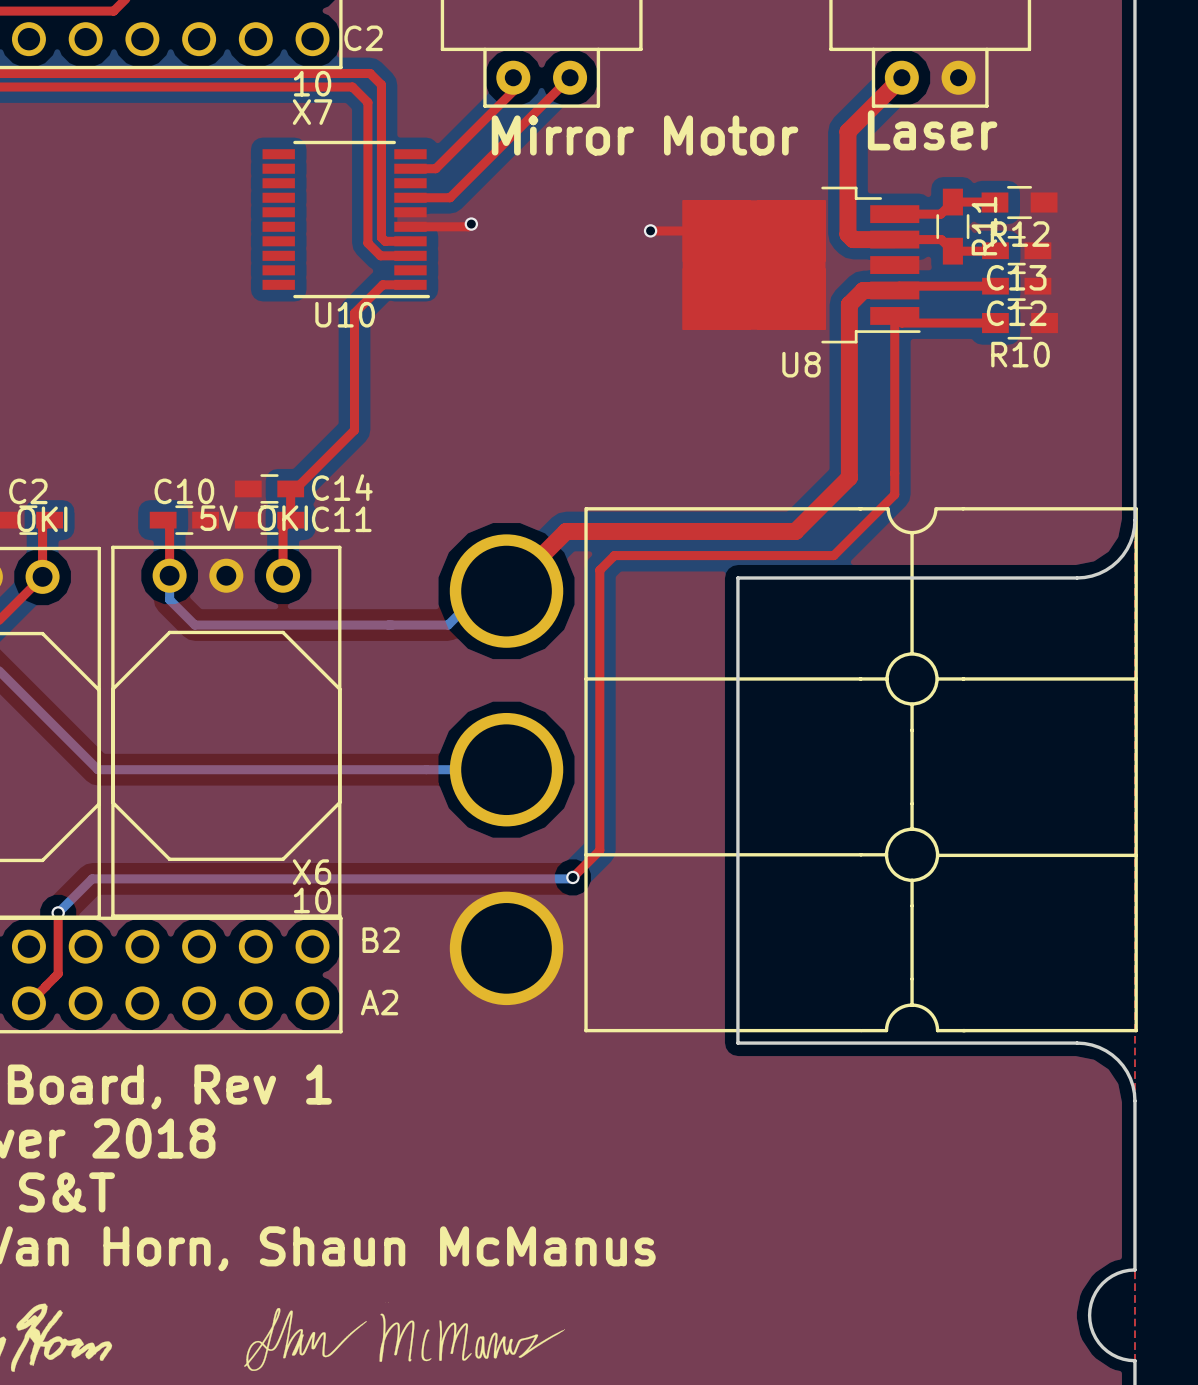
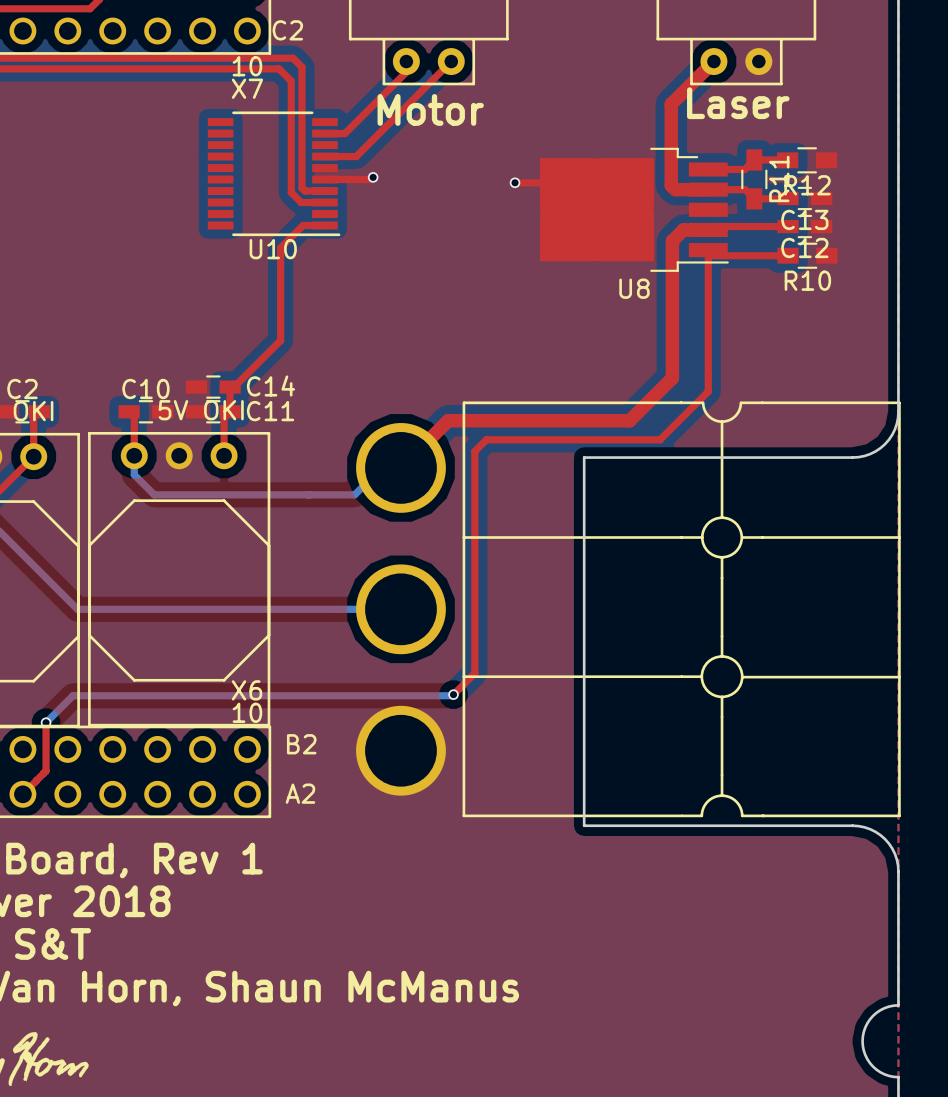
text: Mirror Motor (645, 135) -> none
text: none -> Motor (430, 109)
drawing: [243, 1302, 566, 1371] -> none

